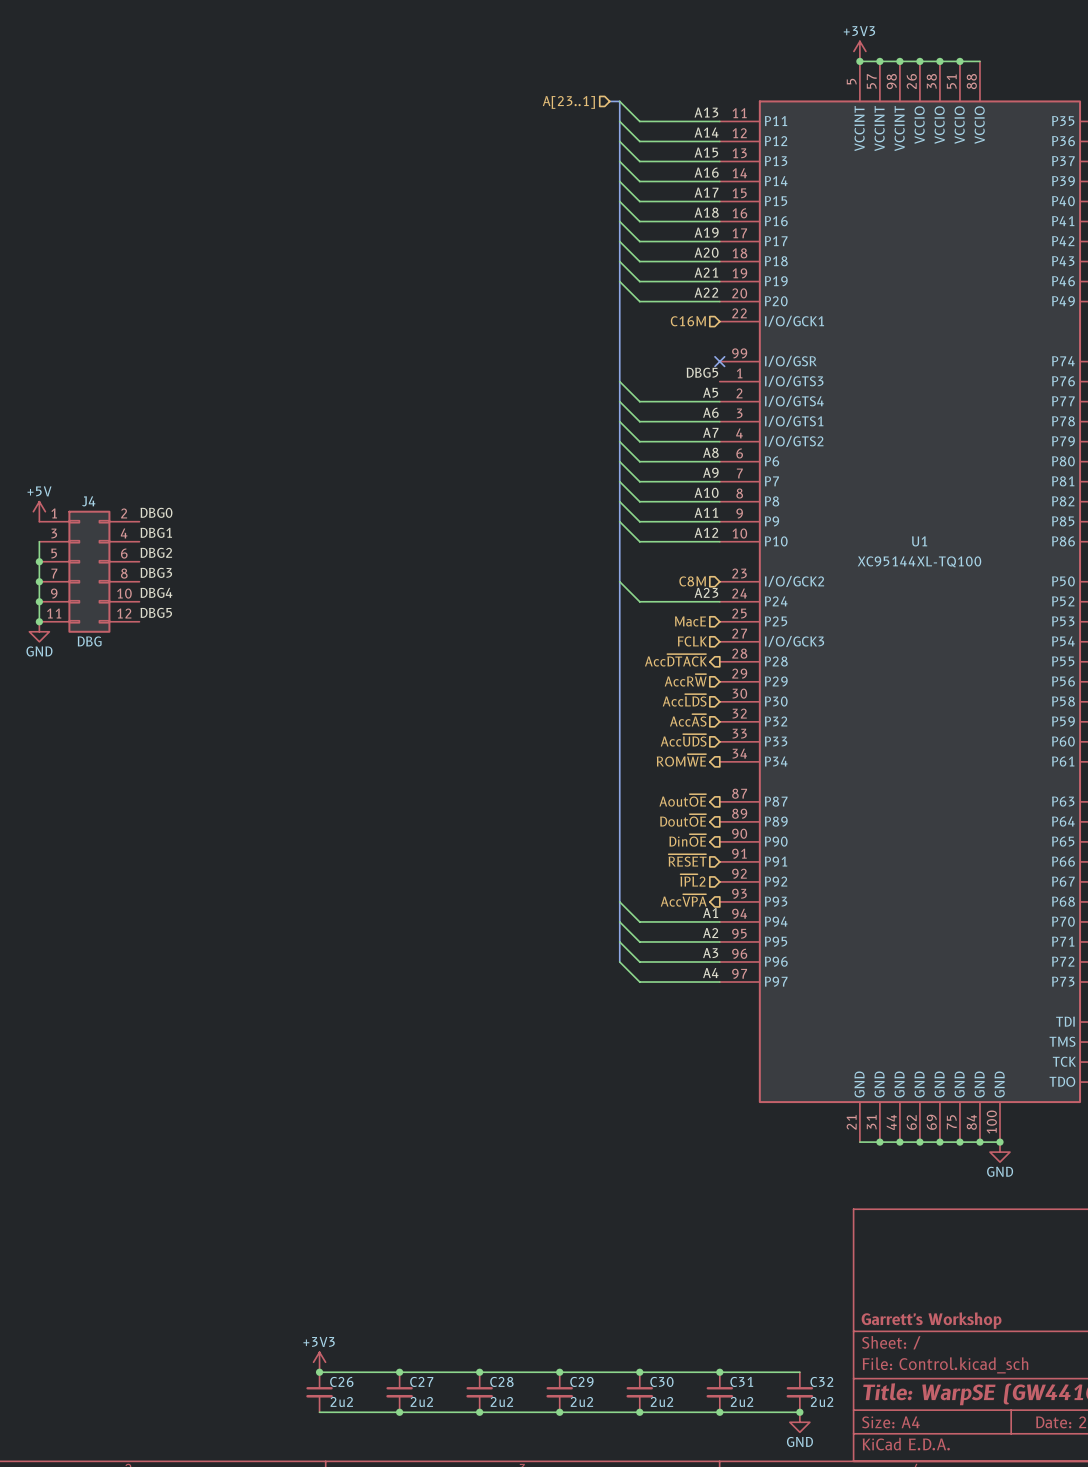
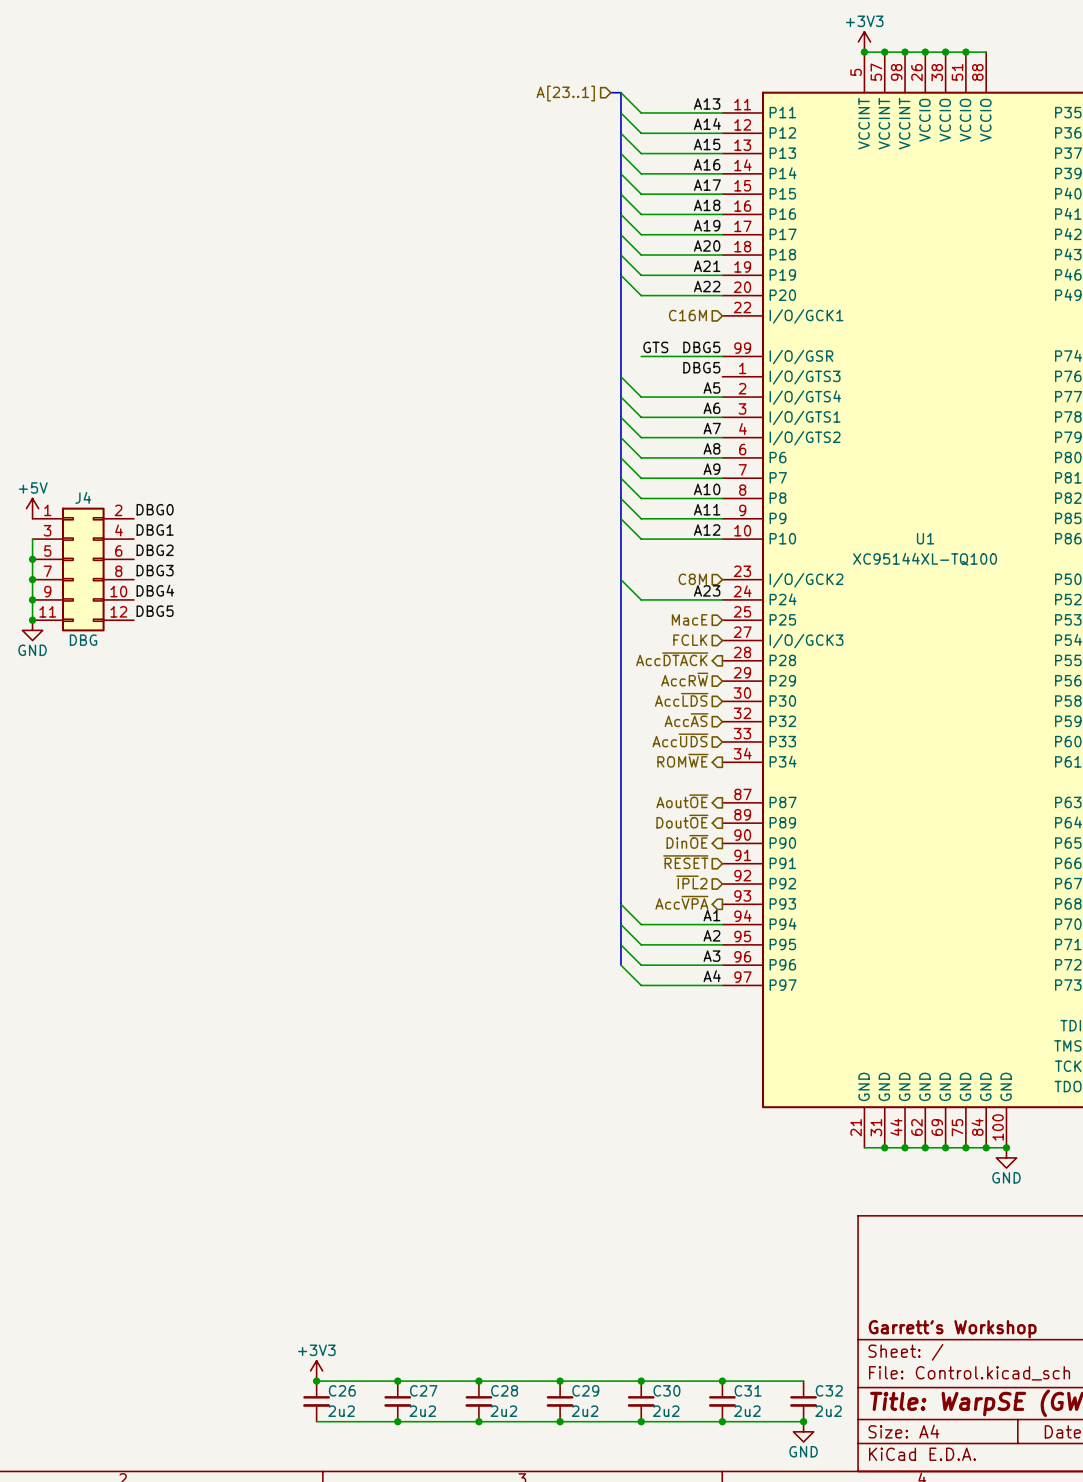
label: none -> GTS (655, 347)
label: none -> DBG5 (701, 347)
wire: none -> (641, 356) (722, 356)
no-connect mark: (719, 361) -> none

